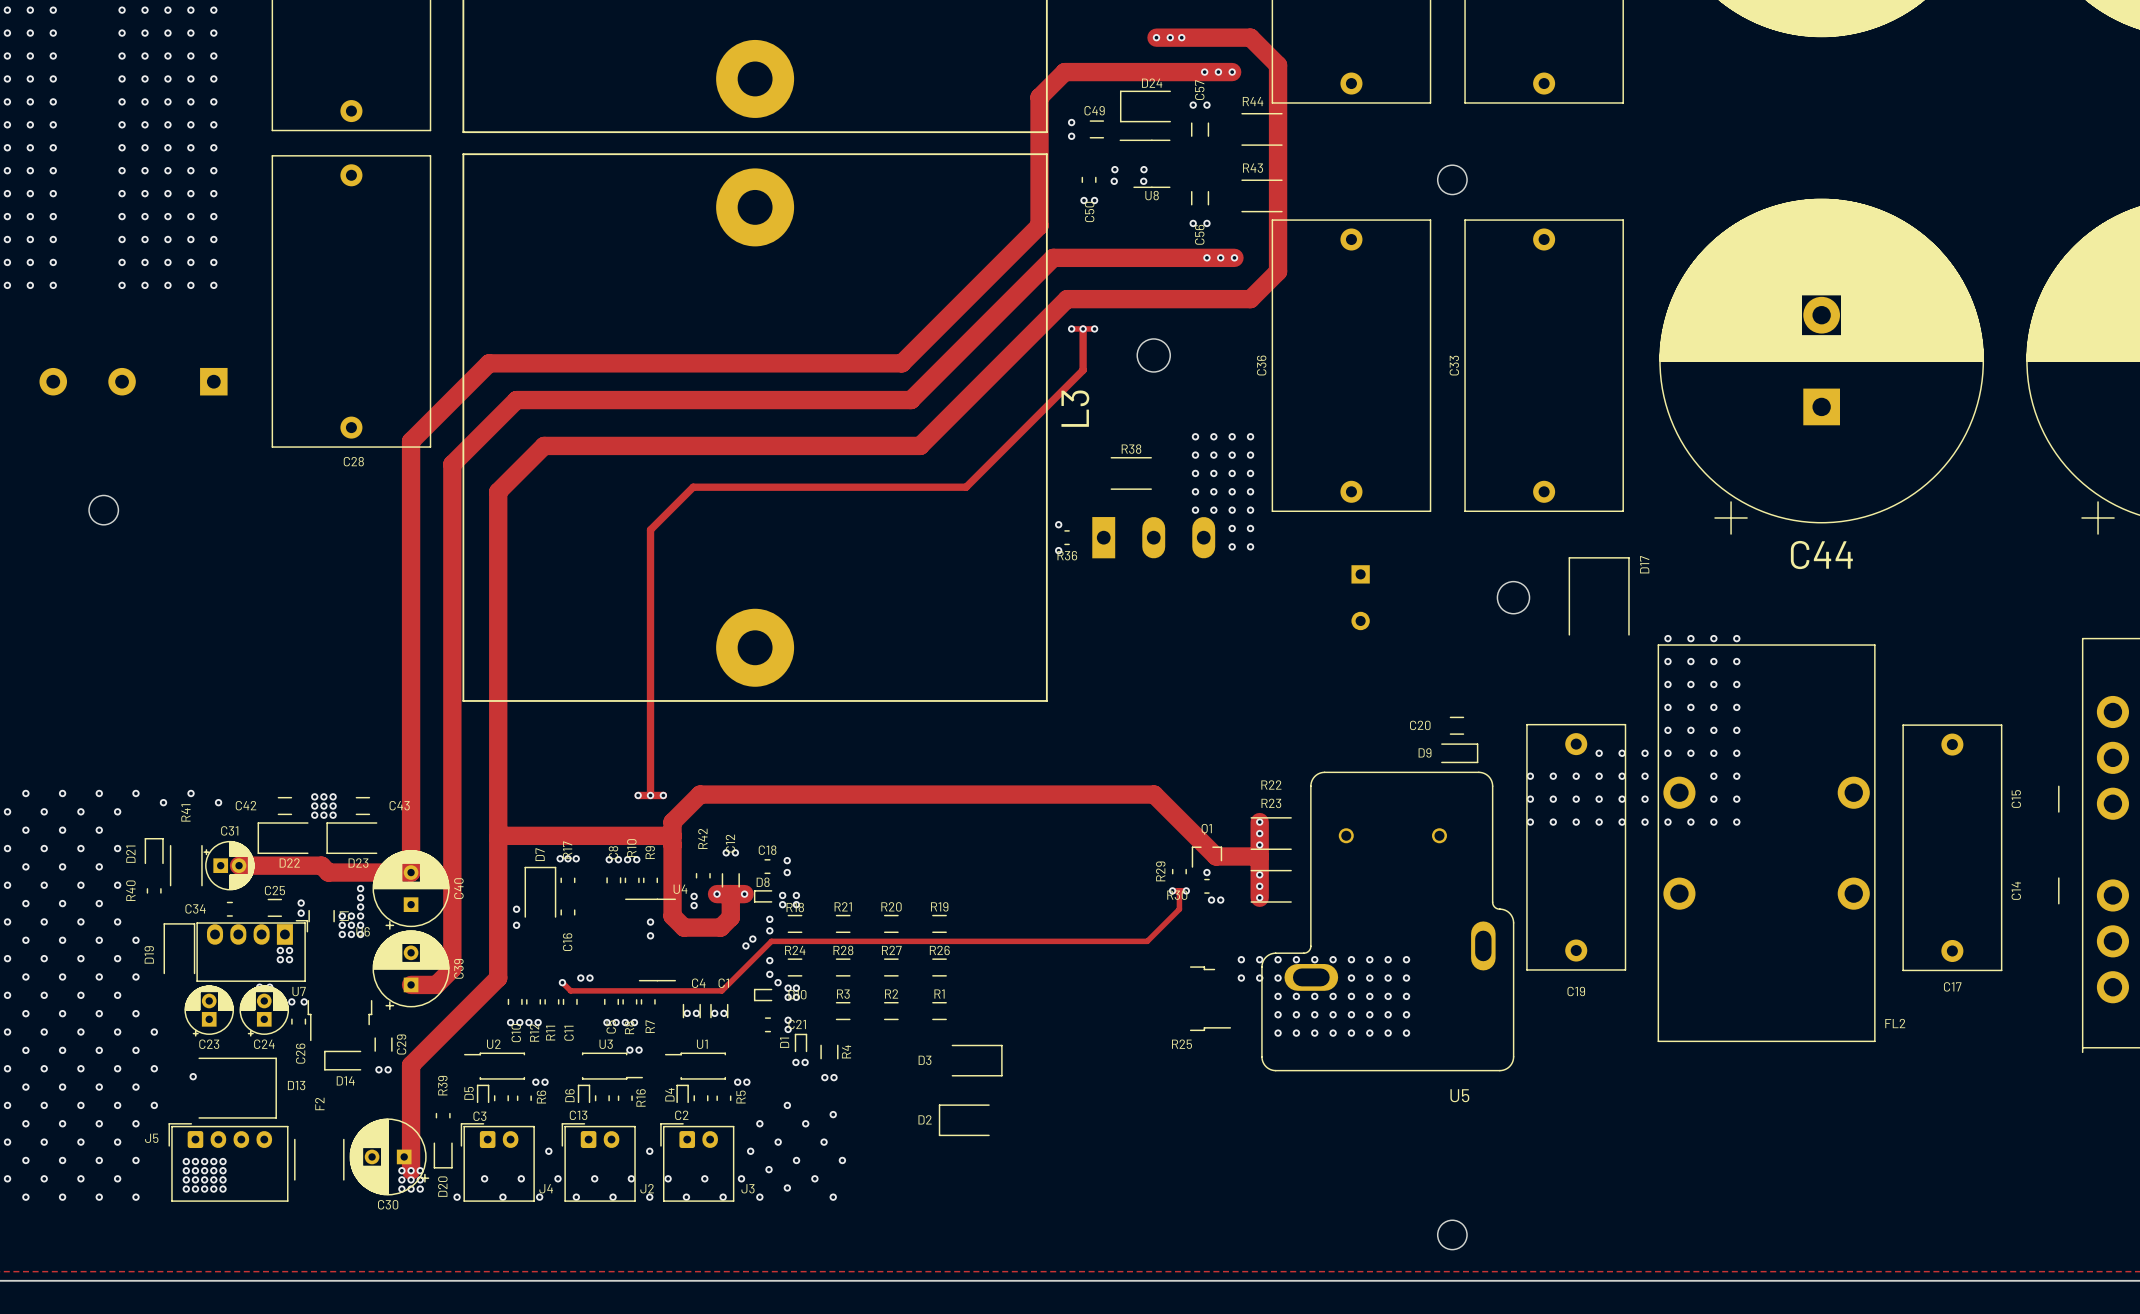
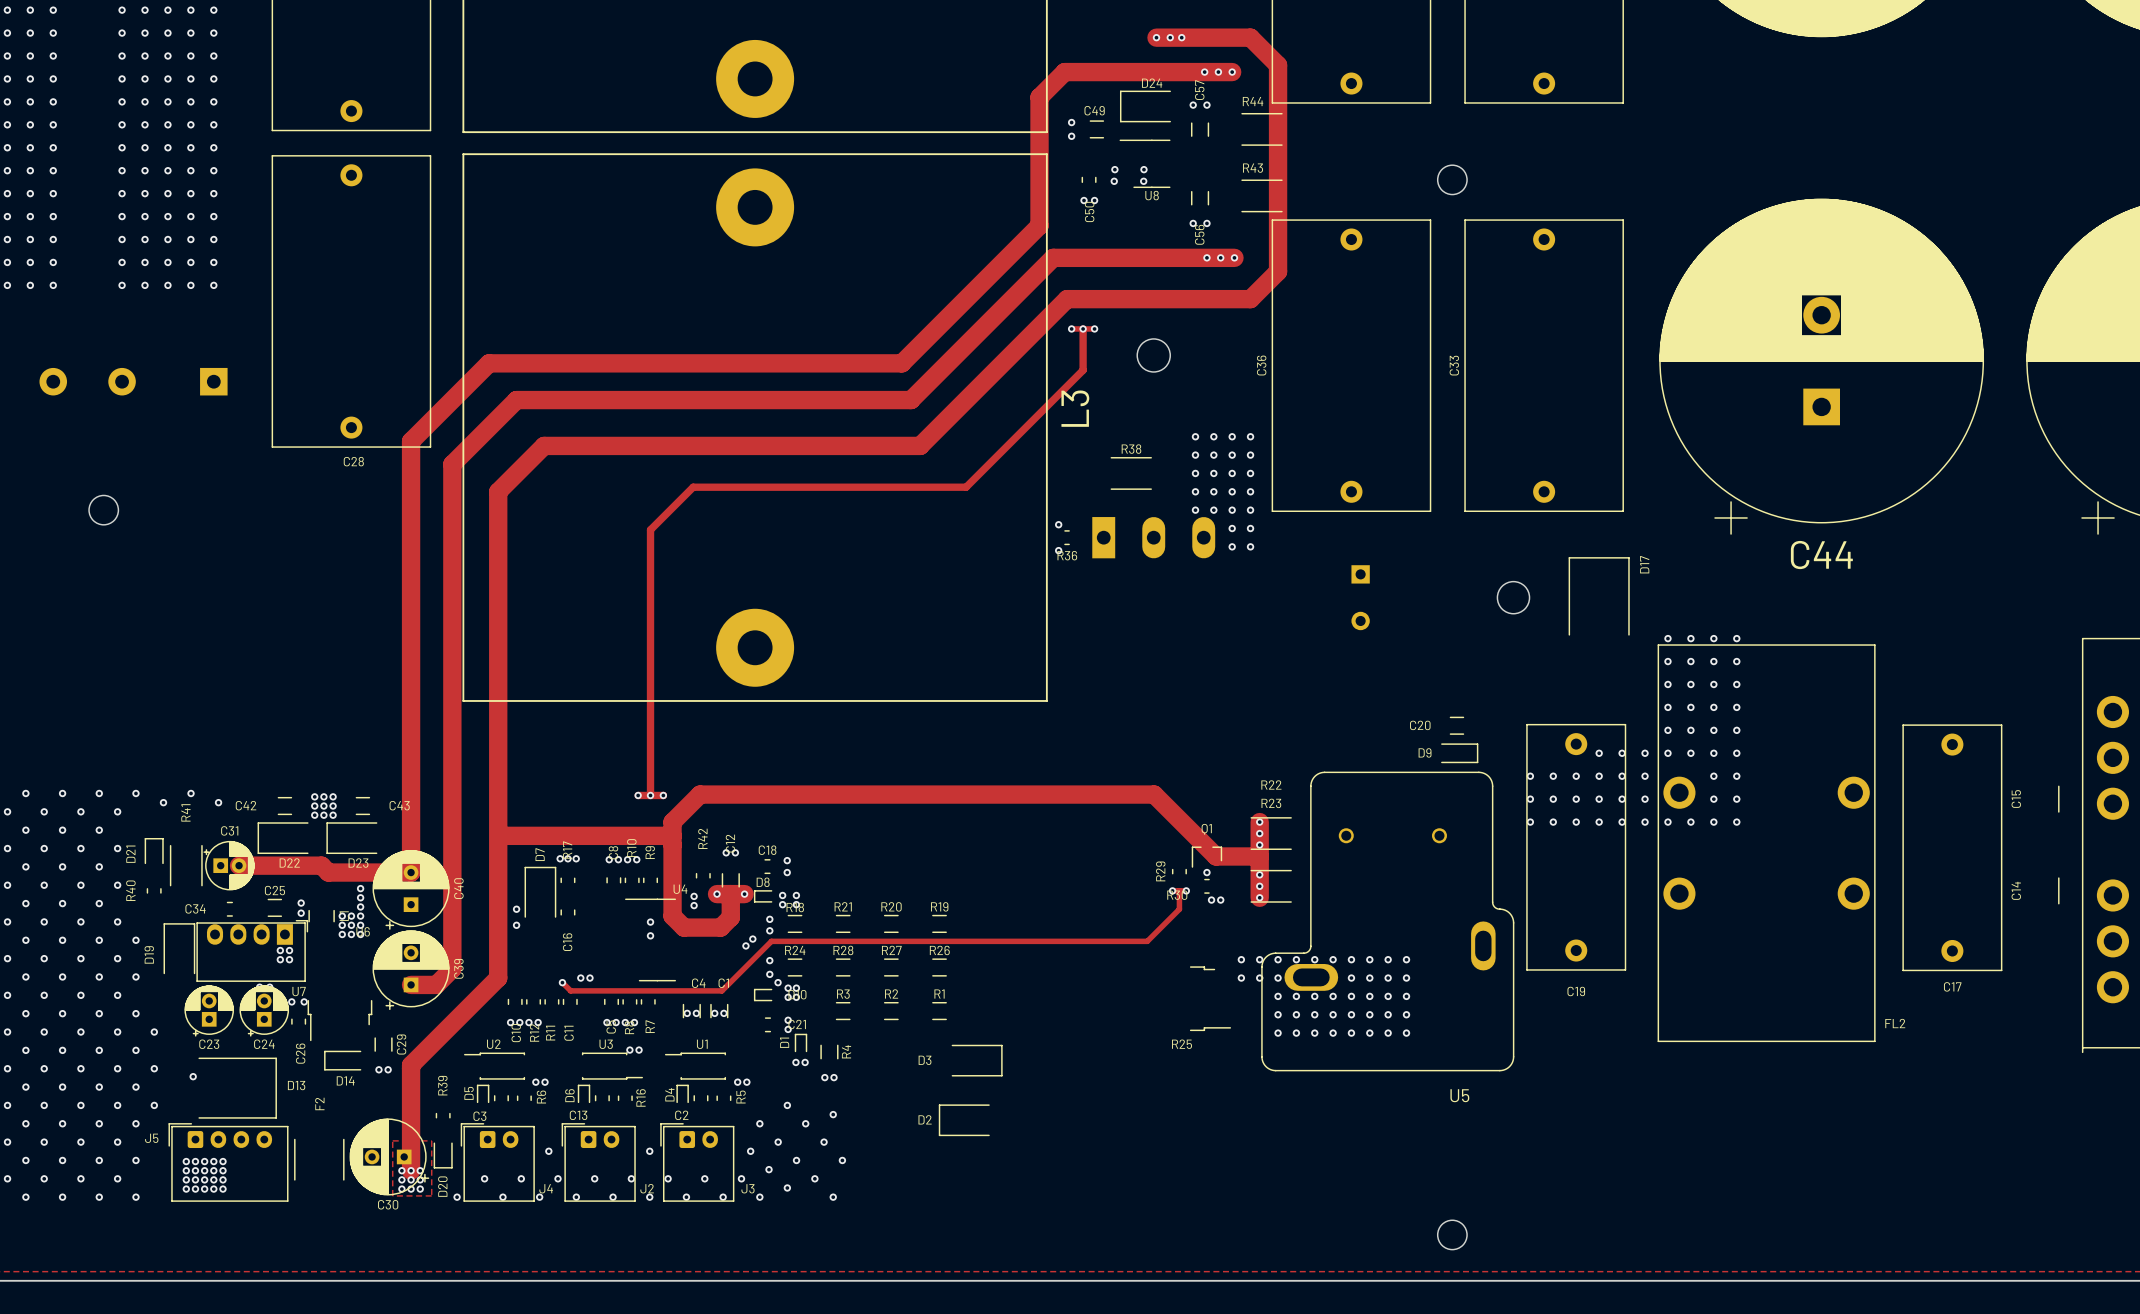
zone outline: none -> (392, 1140) (392, 1195) (431, 1195) (431, 1140) (392, 1140)

